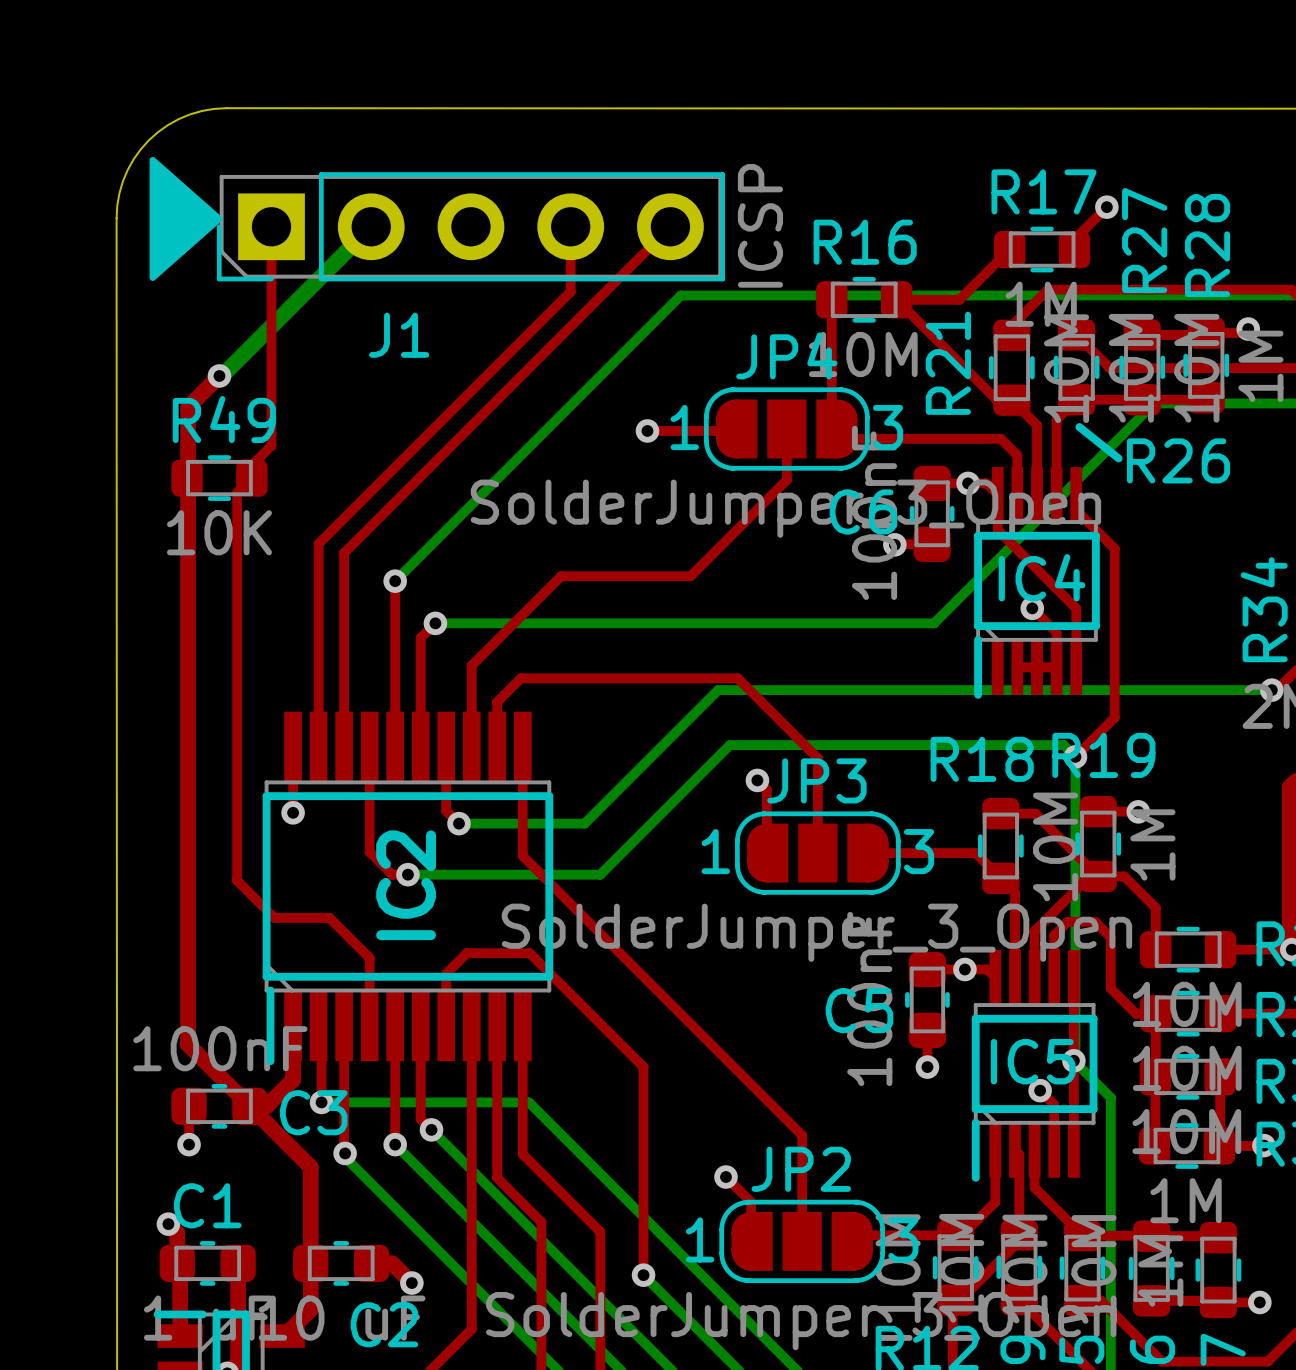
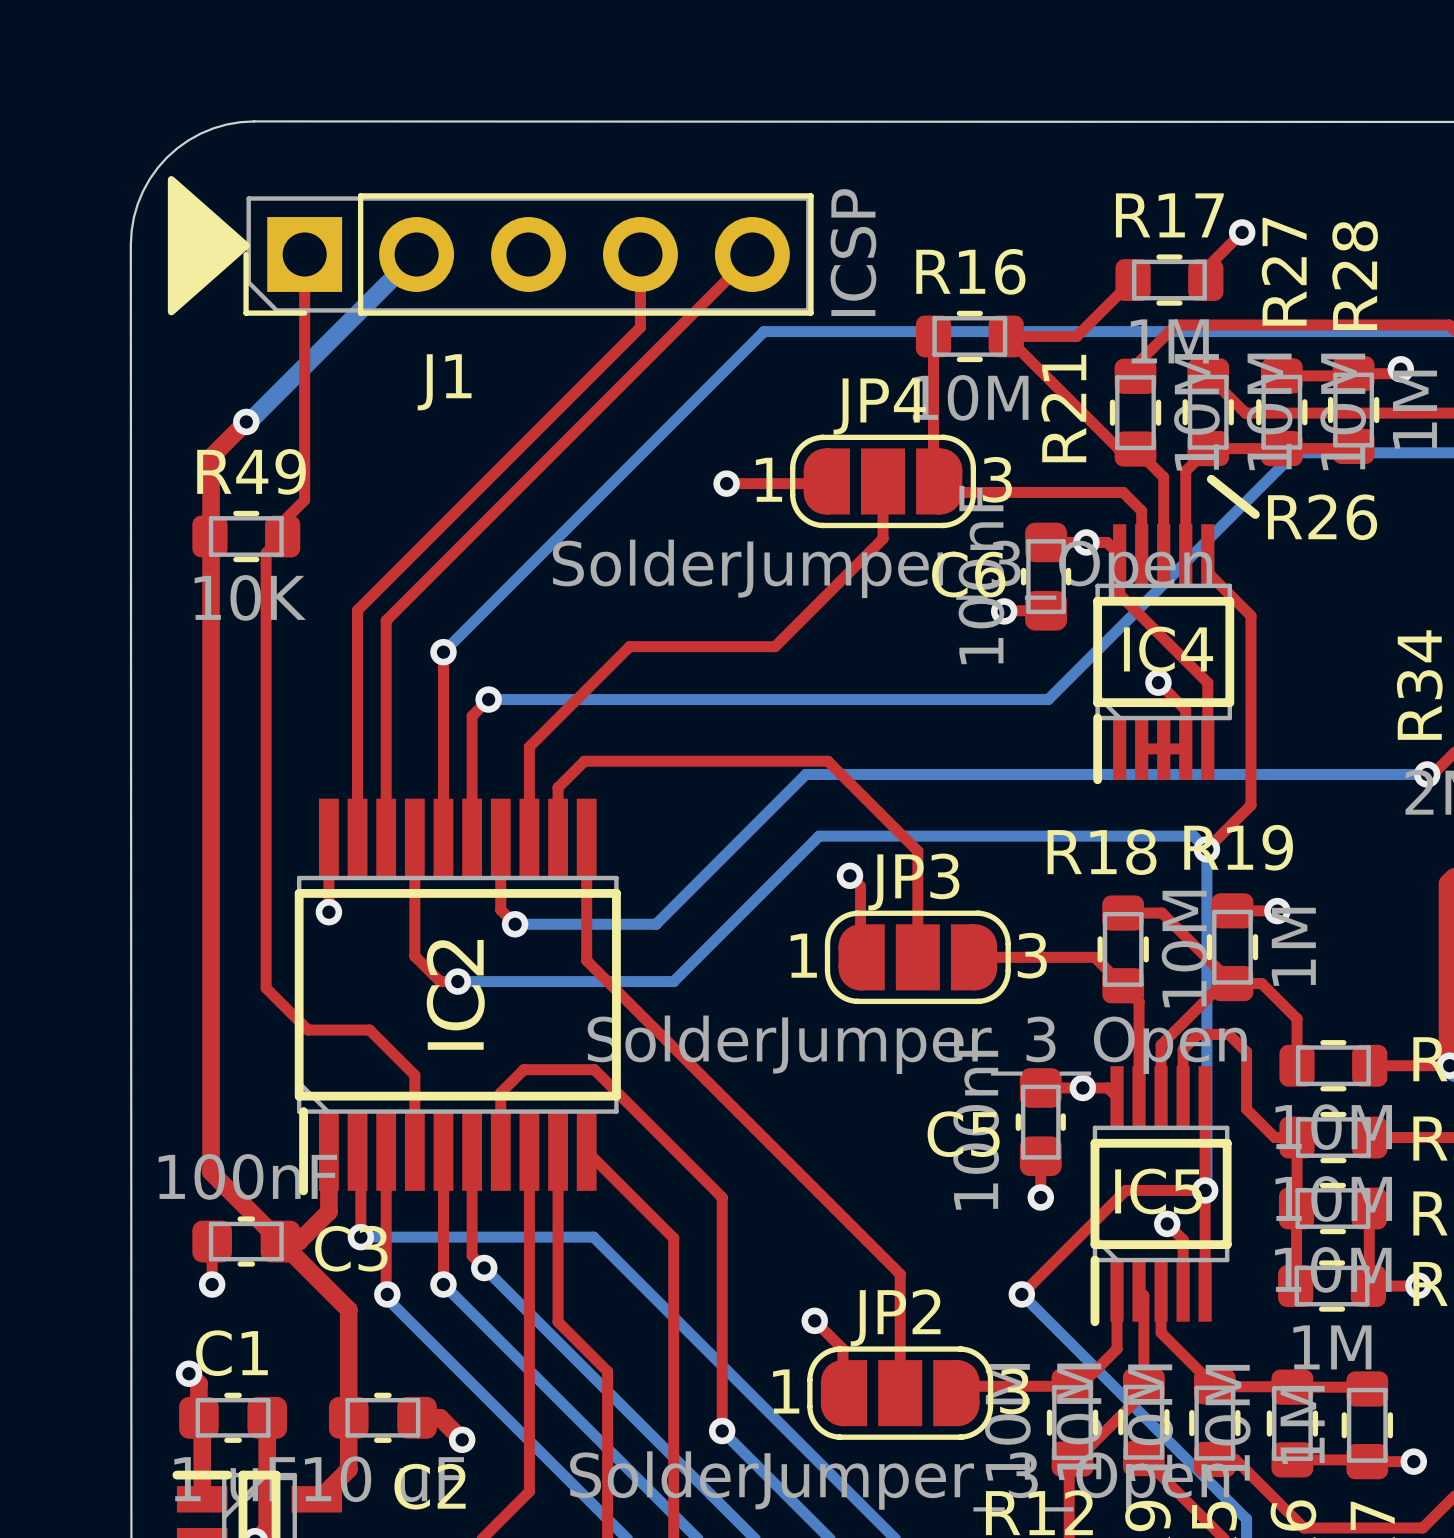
top track: (522, 1025) (522, 1154) (600, 1231) -> (586, 1151) (673, 1238) (673, 1382)
top track: none -> (1205, 1190) (1125, 1190) (1021, 1294)
bottom track: (1073, 1060) (1110, 1097) (1110, 1353) -> (1021, 1294) (1246, 1519)
via: none -> (1021, 1294)

